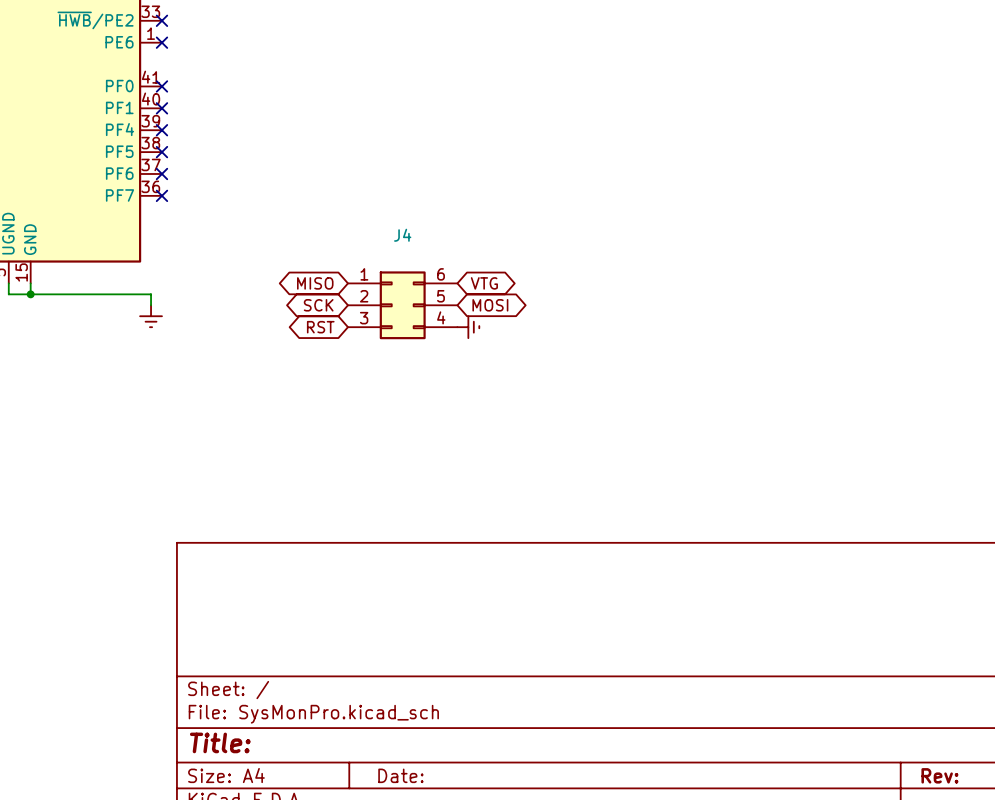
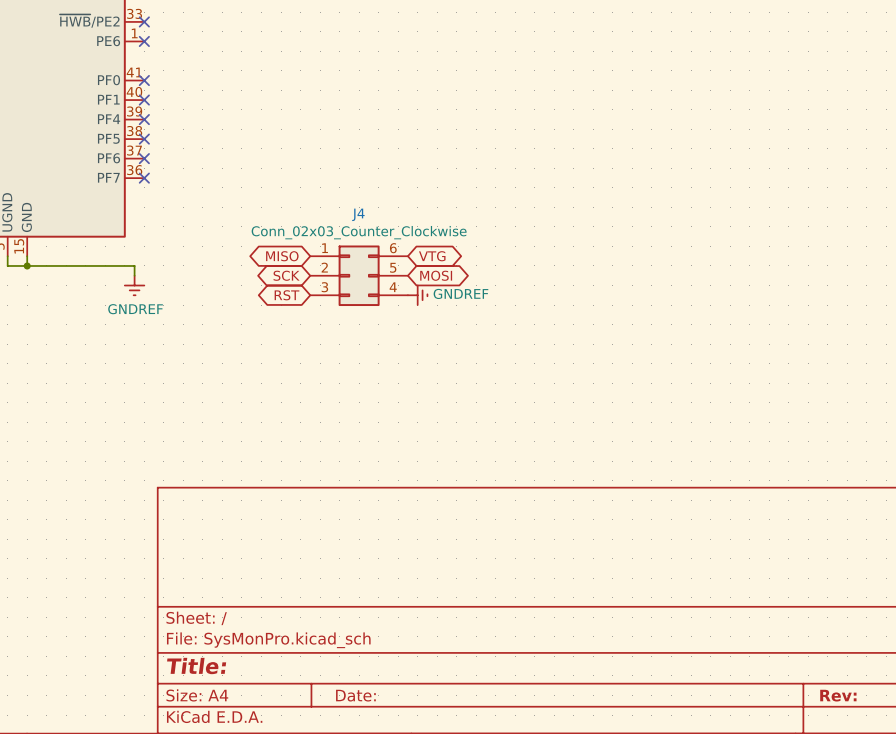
J4 value: none -> Conn_02x03_Counter_Clockwise (359, 232)
power symbol text: none -> GNDREF (460, 293)
power symbol text: none -> GNDREF (135, 309)

